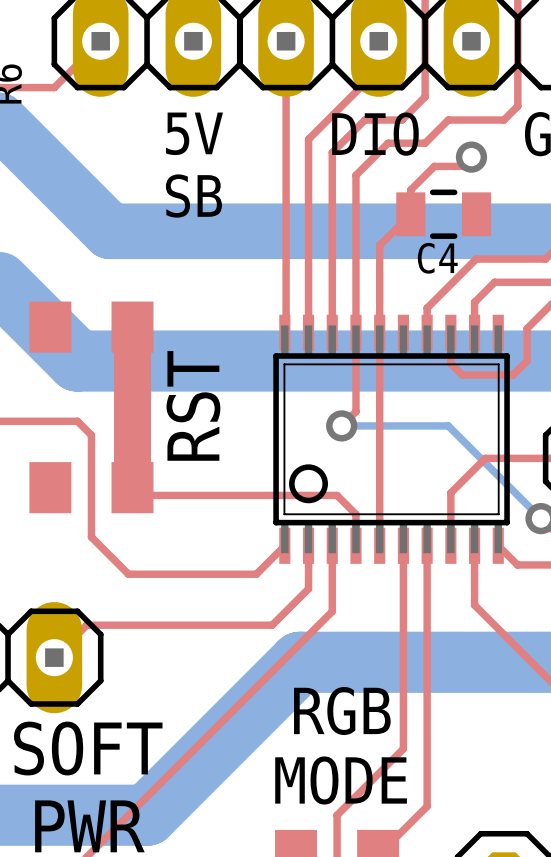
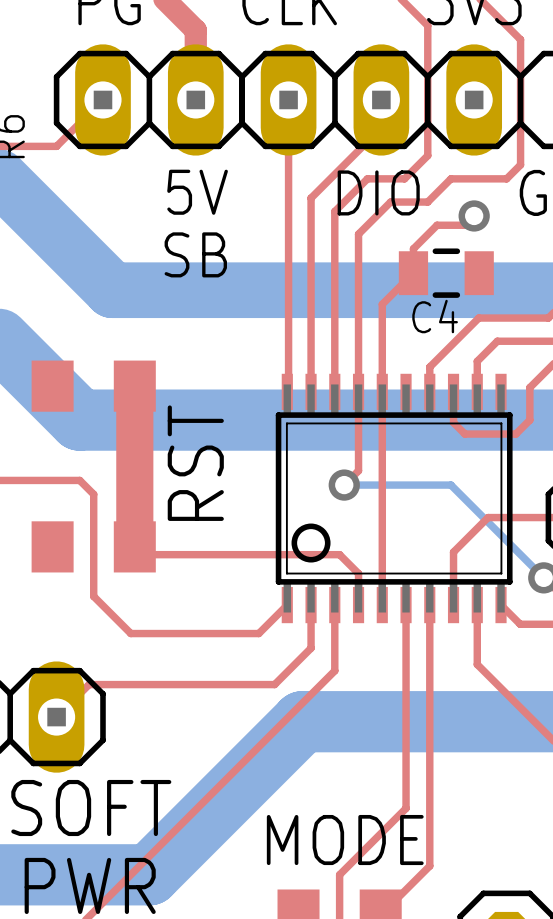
text: RGB (342, 710) -> none

